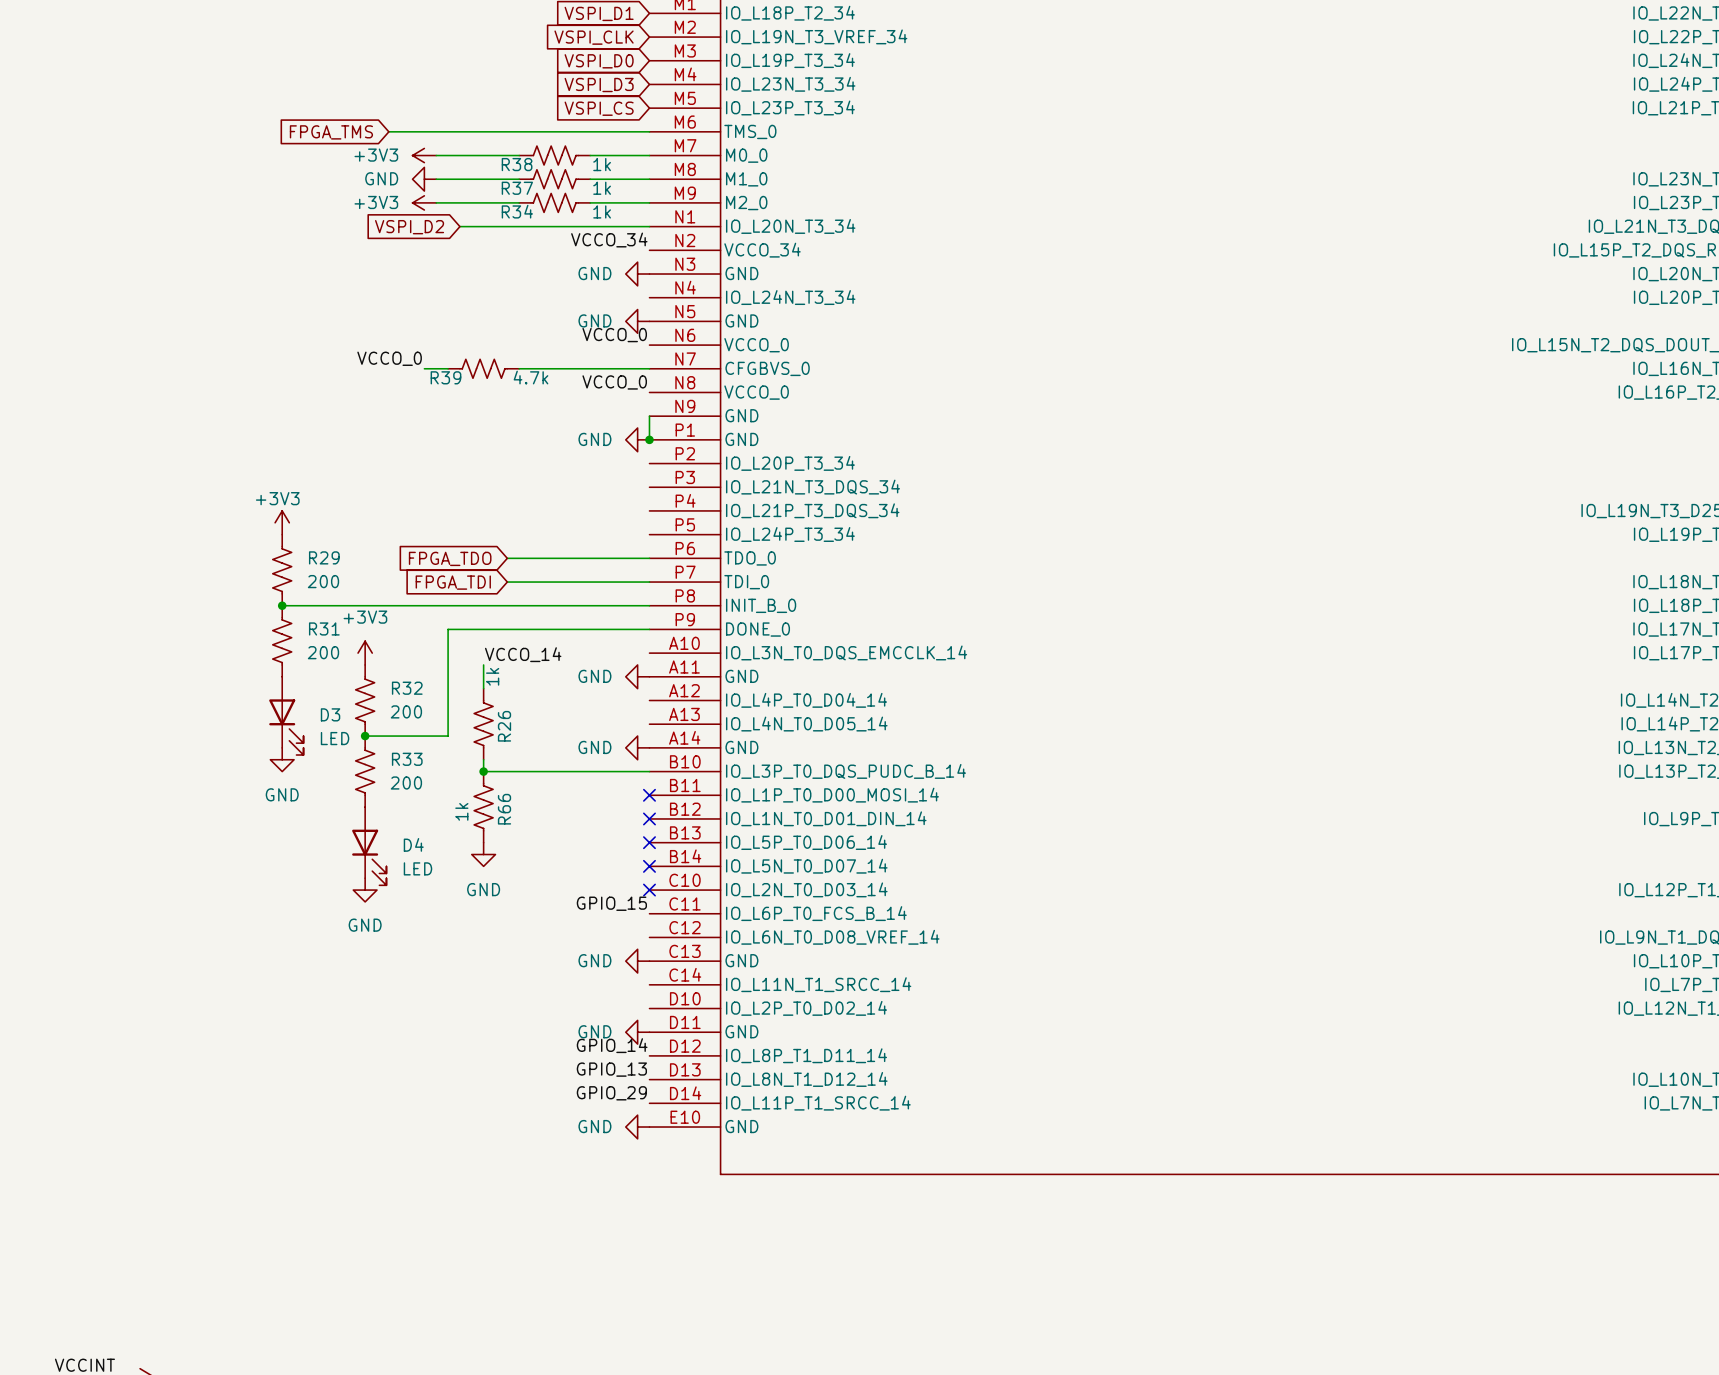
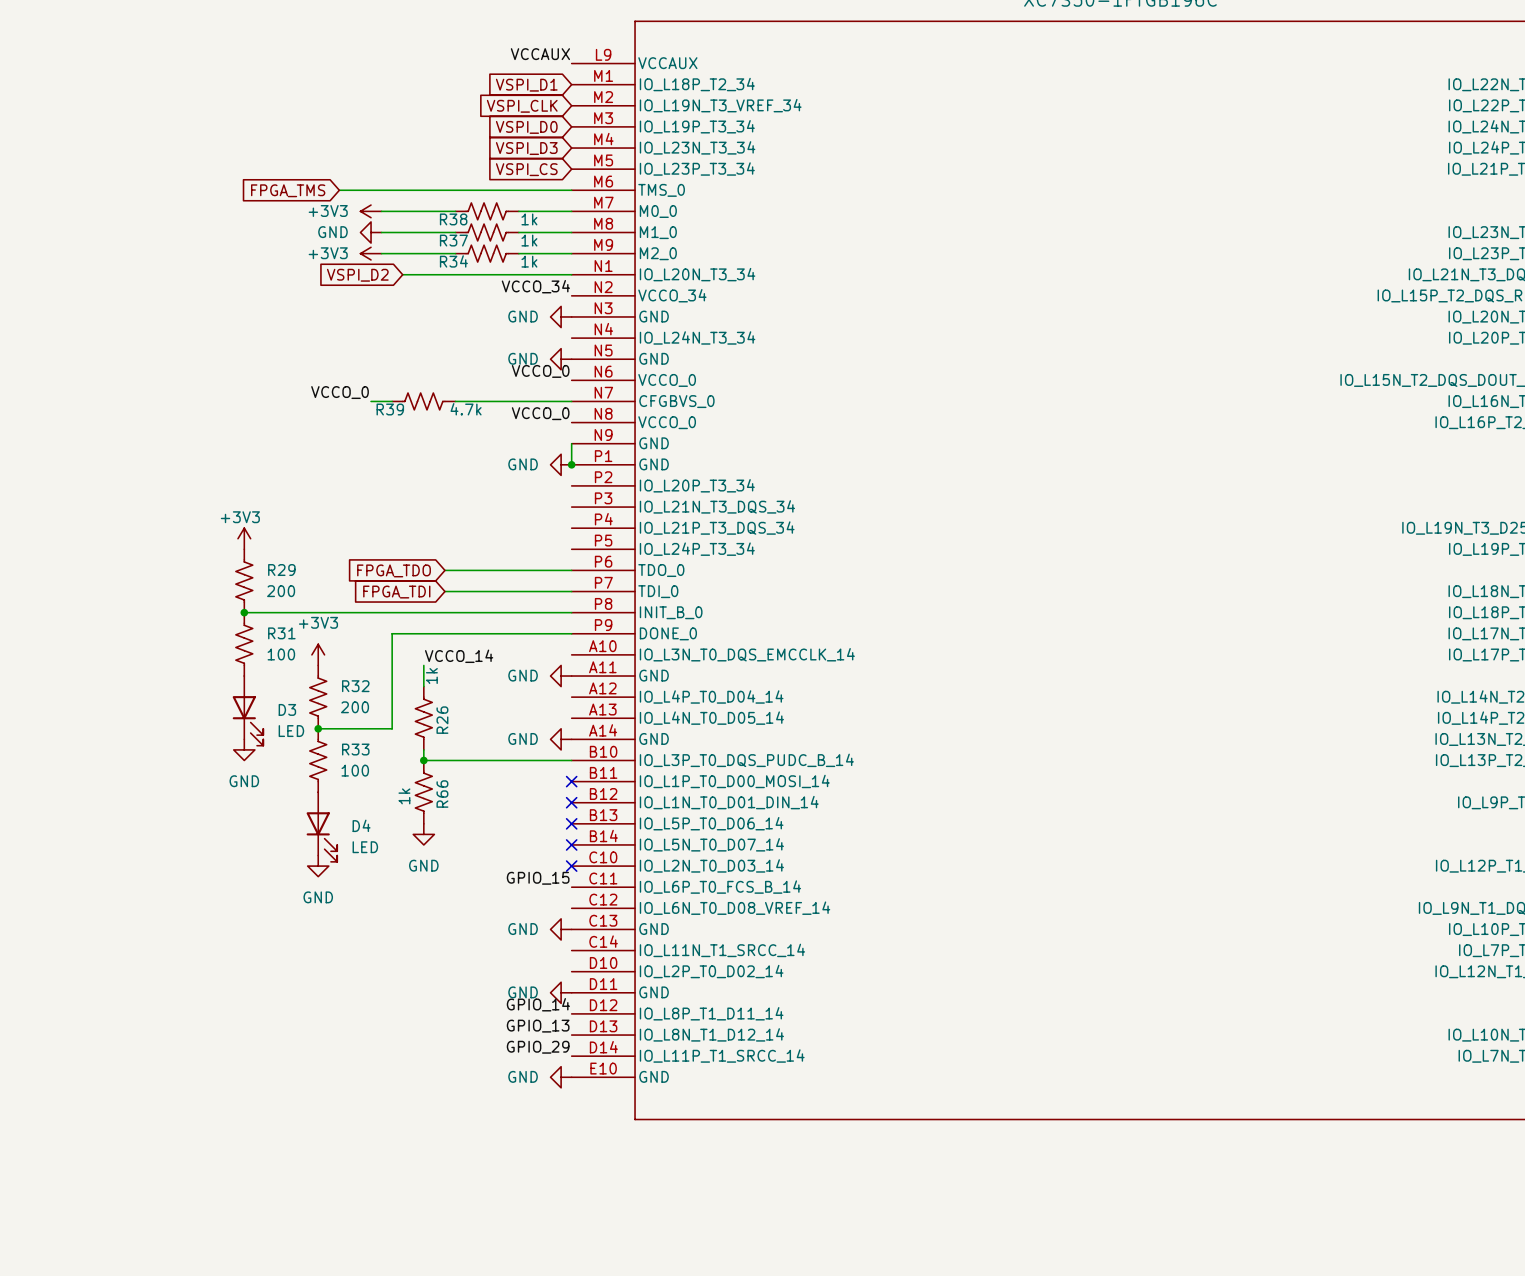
R31 value: 200 (323, 652) -> 100 (281, 654)
R33 value: 200 (406, 782) -> 100 (355, 770)

